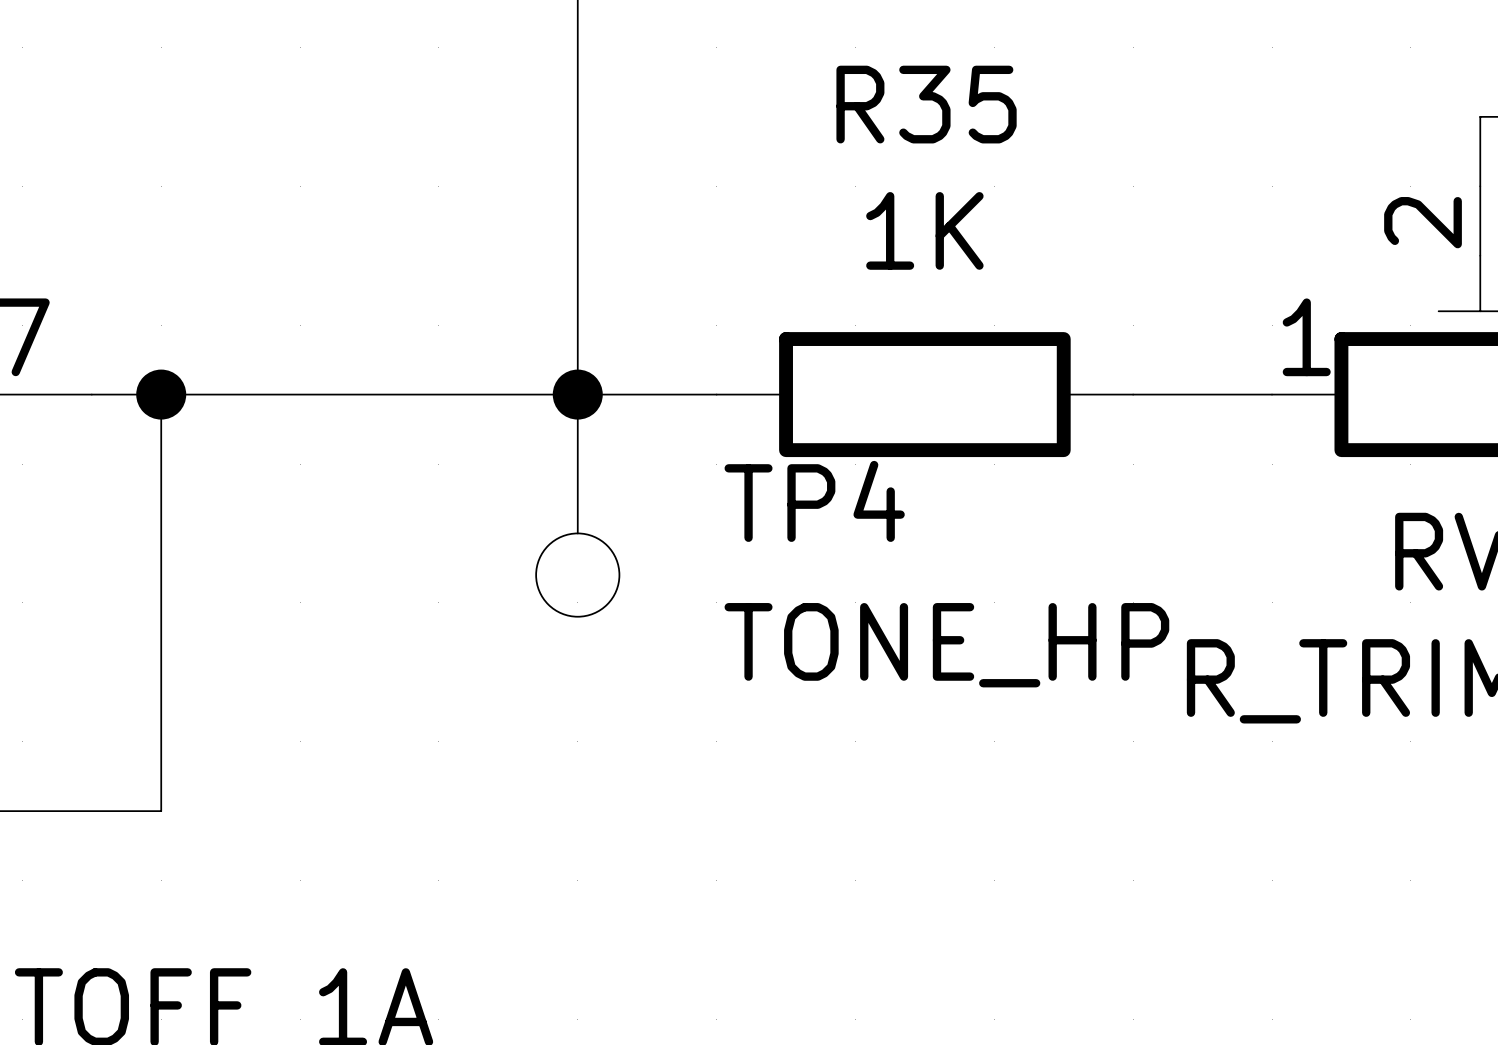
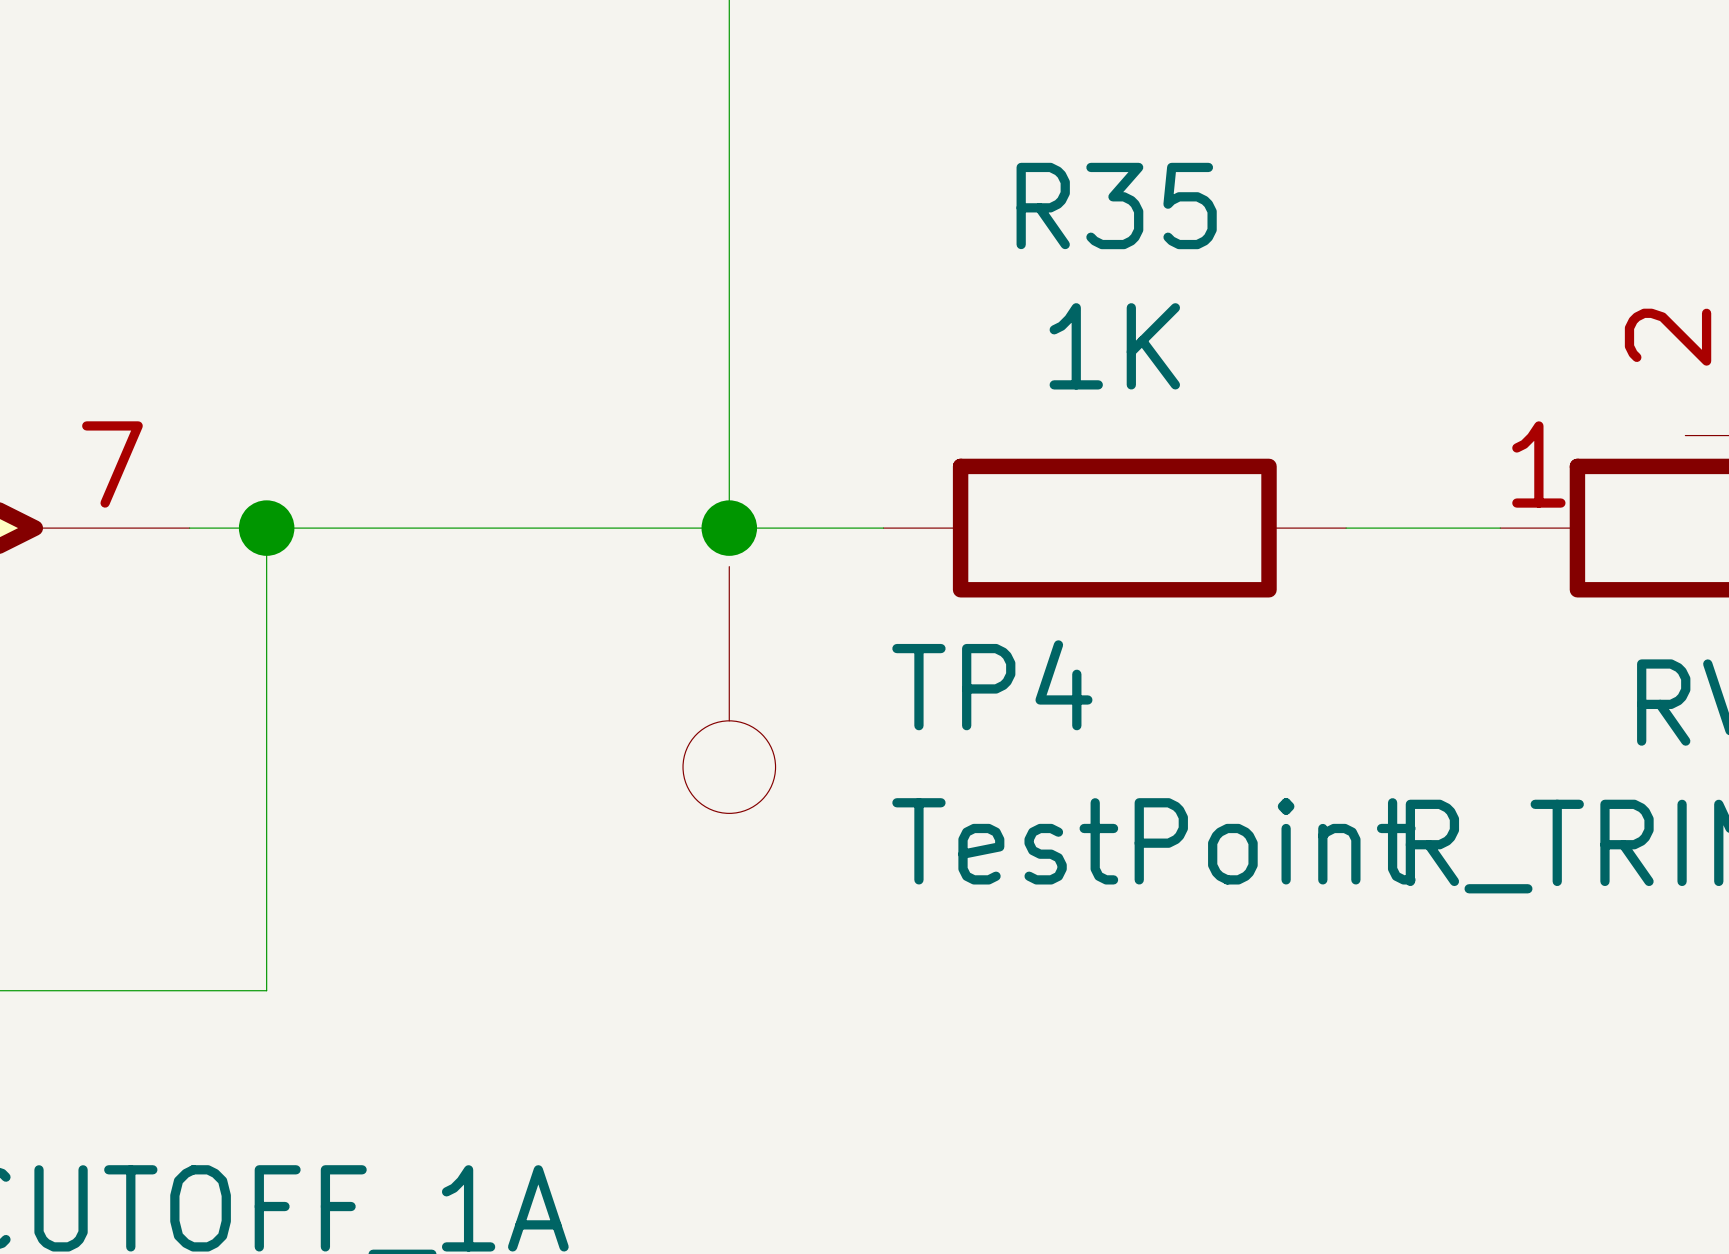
TP4 position: (577, 505) -> (729, 690)
TP4 value: TONE_HP (946, 645) -> TestPoint (1153, 841)

